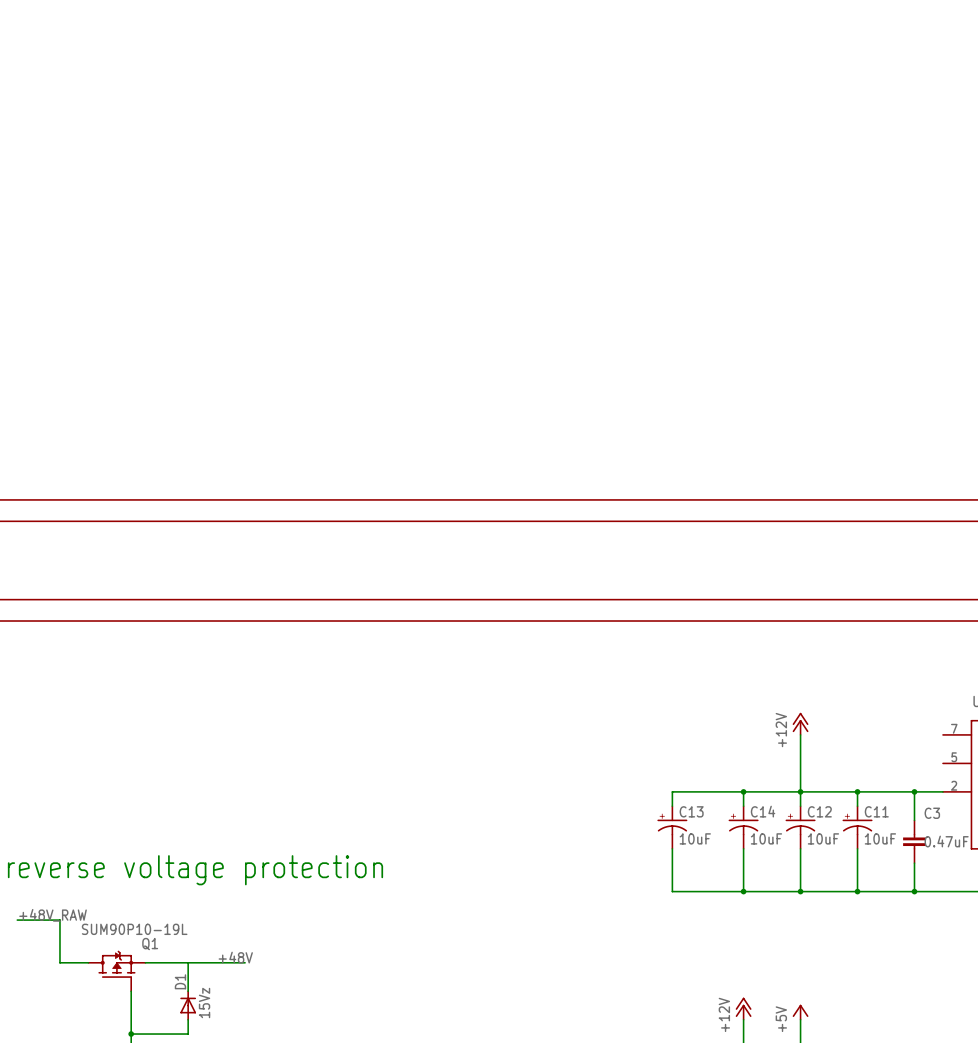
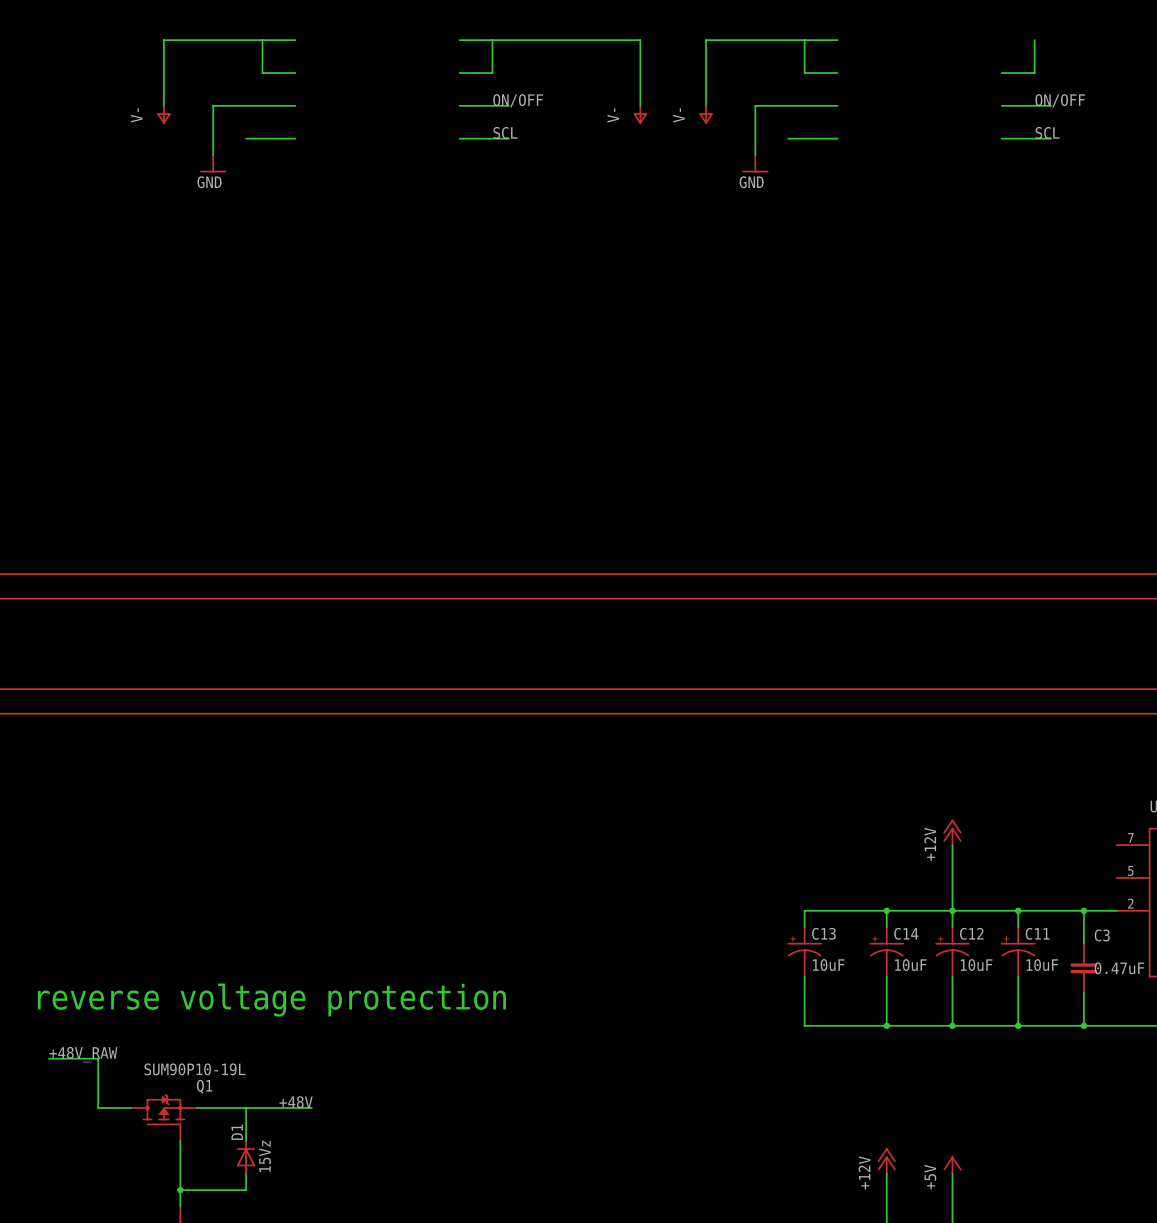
wire: none -> (262, 40) (262, 72) (295, 72)
wire: none -> (295, 40) (163, 40) (163, 105)
wire: none -> (459, 40) (640, 40) (640, 105)
wire: none -> (492, 40) (492, 72) (459, 72)
wire: none -> (804, 40) (804, 72) (837, 72)
wire: none -> (837, 40) (706, 40) (706, 105)
wire: none -> (1034, 40) (1034, 72) (1001, 72)
label: none -> ON/OFF (518, 100)
label: none -> ON/OFF (1060, 100)
wire: none -> (295, 105) (213, 105) (213, 155)
wire: none -> (459, 105) (508, 105)
wire: none -> (837, 105) (755, 105) (755, 155)
wire: none -> (1001, 105) (1051, 105)
power symbol: none -> V- (163, 114)
power symbol: none -> V- (640, 114)
power symbol: none -> V- (706, 114)
label: none -> SCL (505, 132)
label: none -> SCL (1047, 132)
wire: none -> (246, 138) (295, 138)
wire: none -> (459, 138) (508, 138)
wire: none -> (788, 138) (837, 138)
wire: none -> (1001, 138) (1051, 138)
power symbol: none -> GND (213, 163)
power symbol: none -> GND (755, 163)

